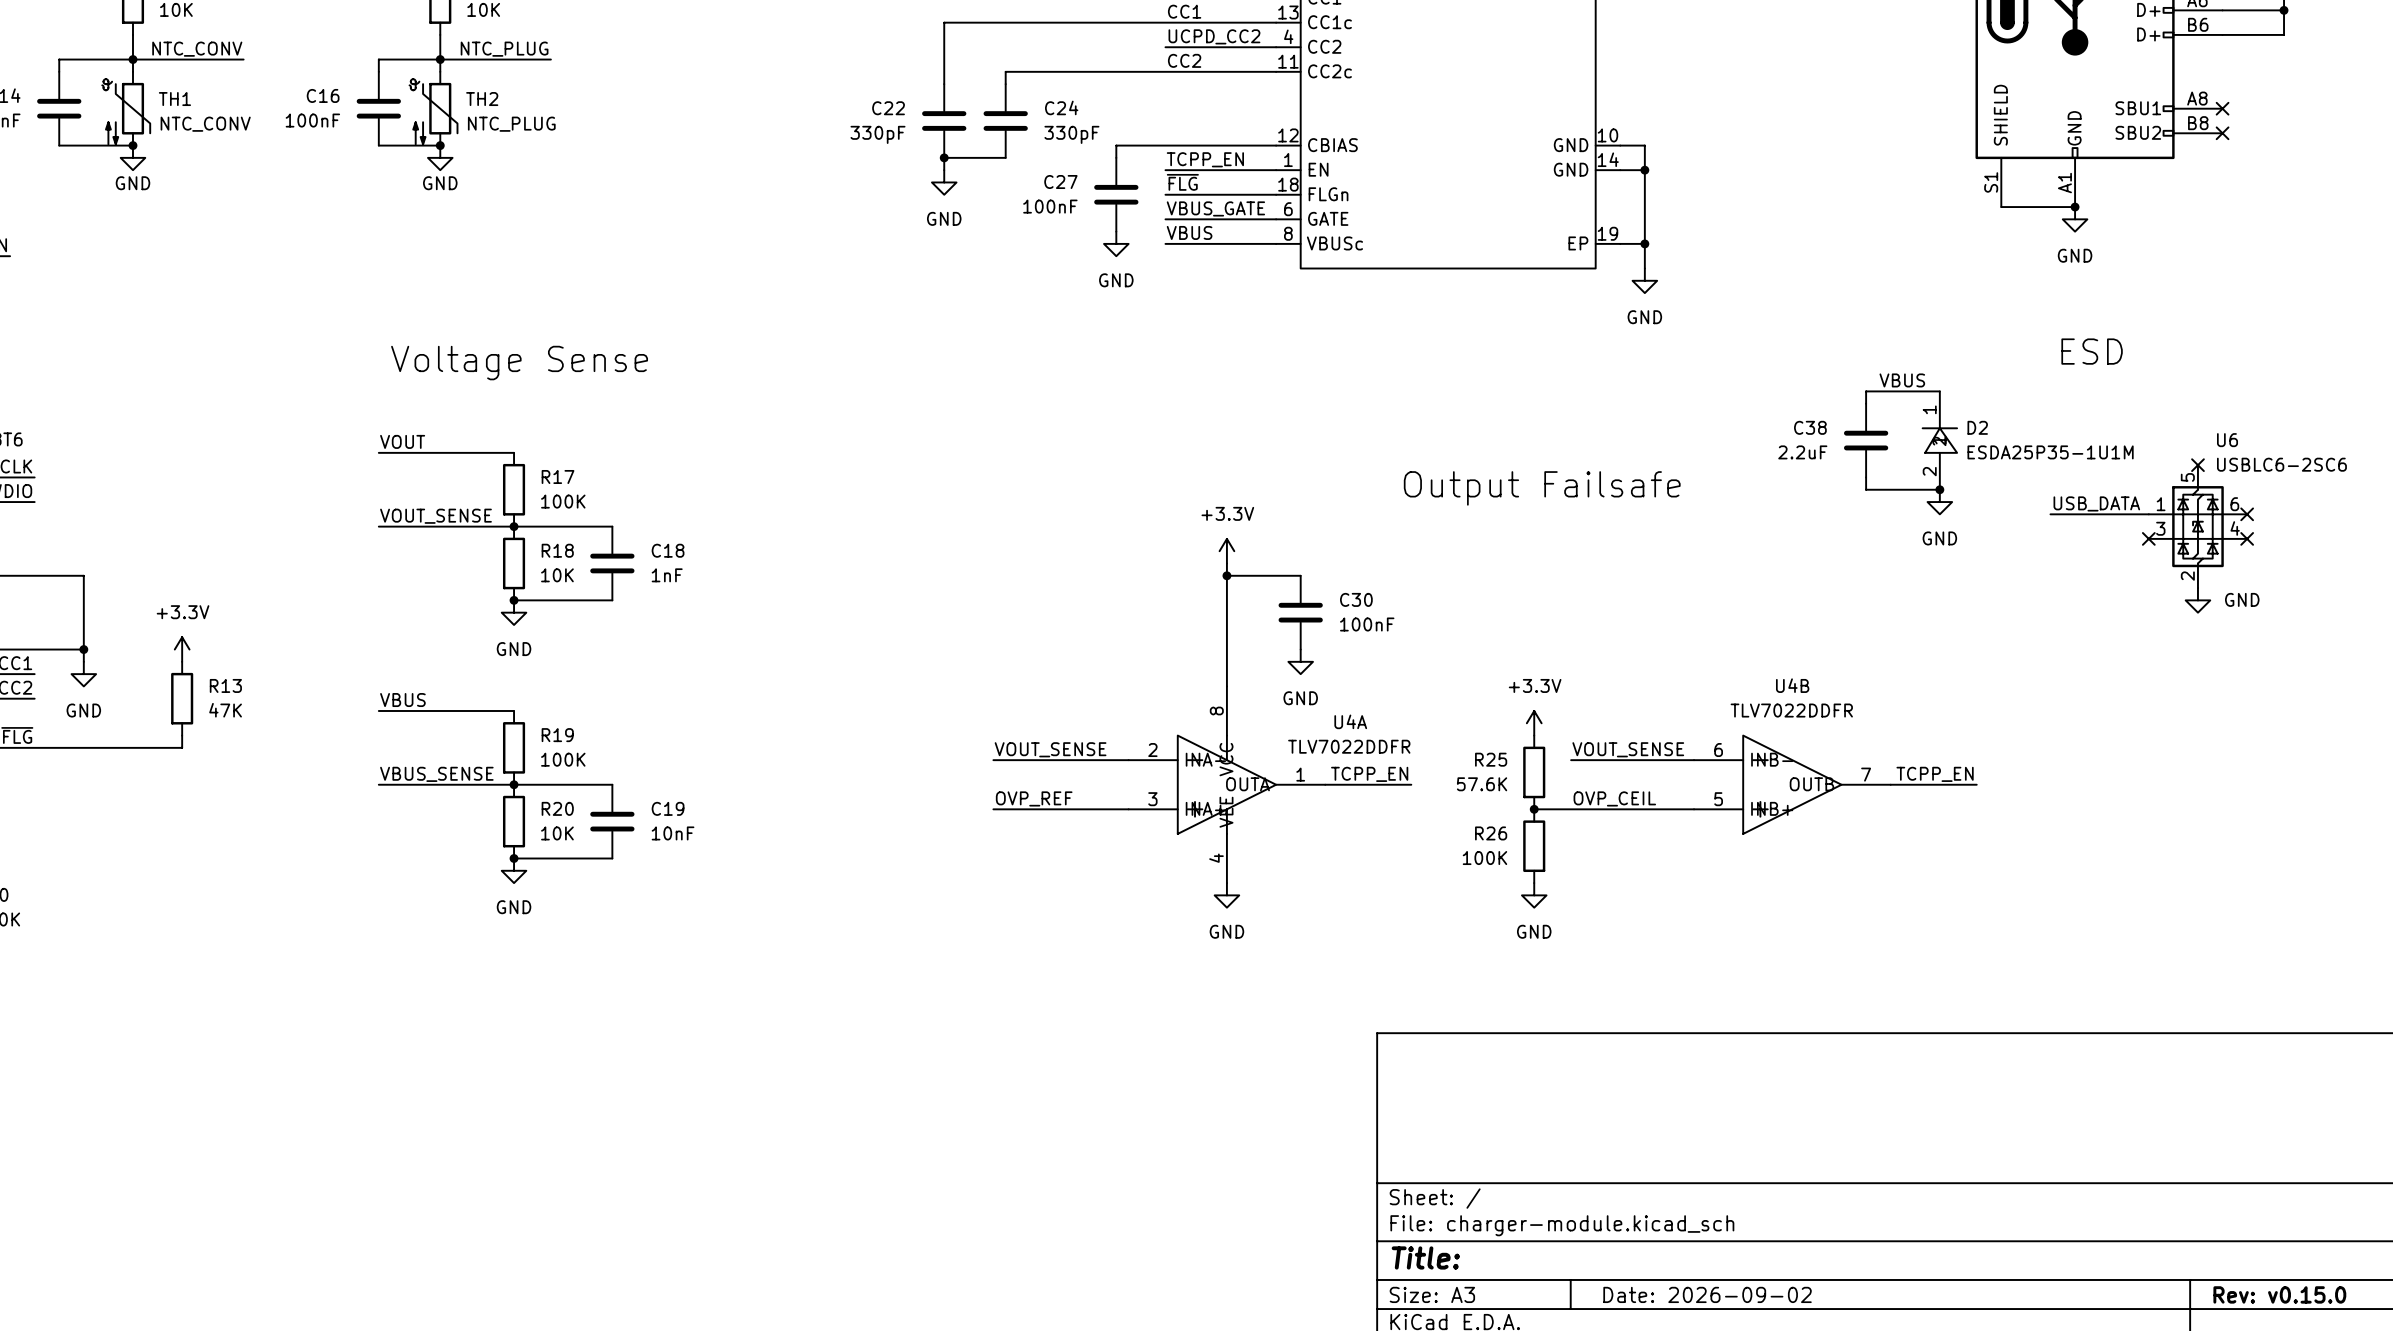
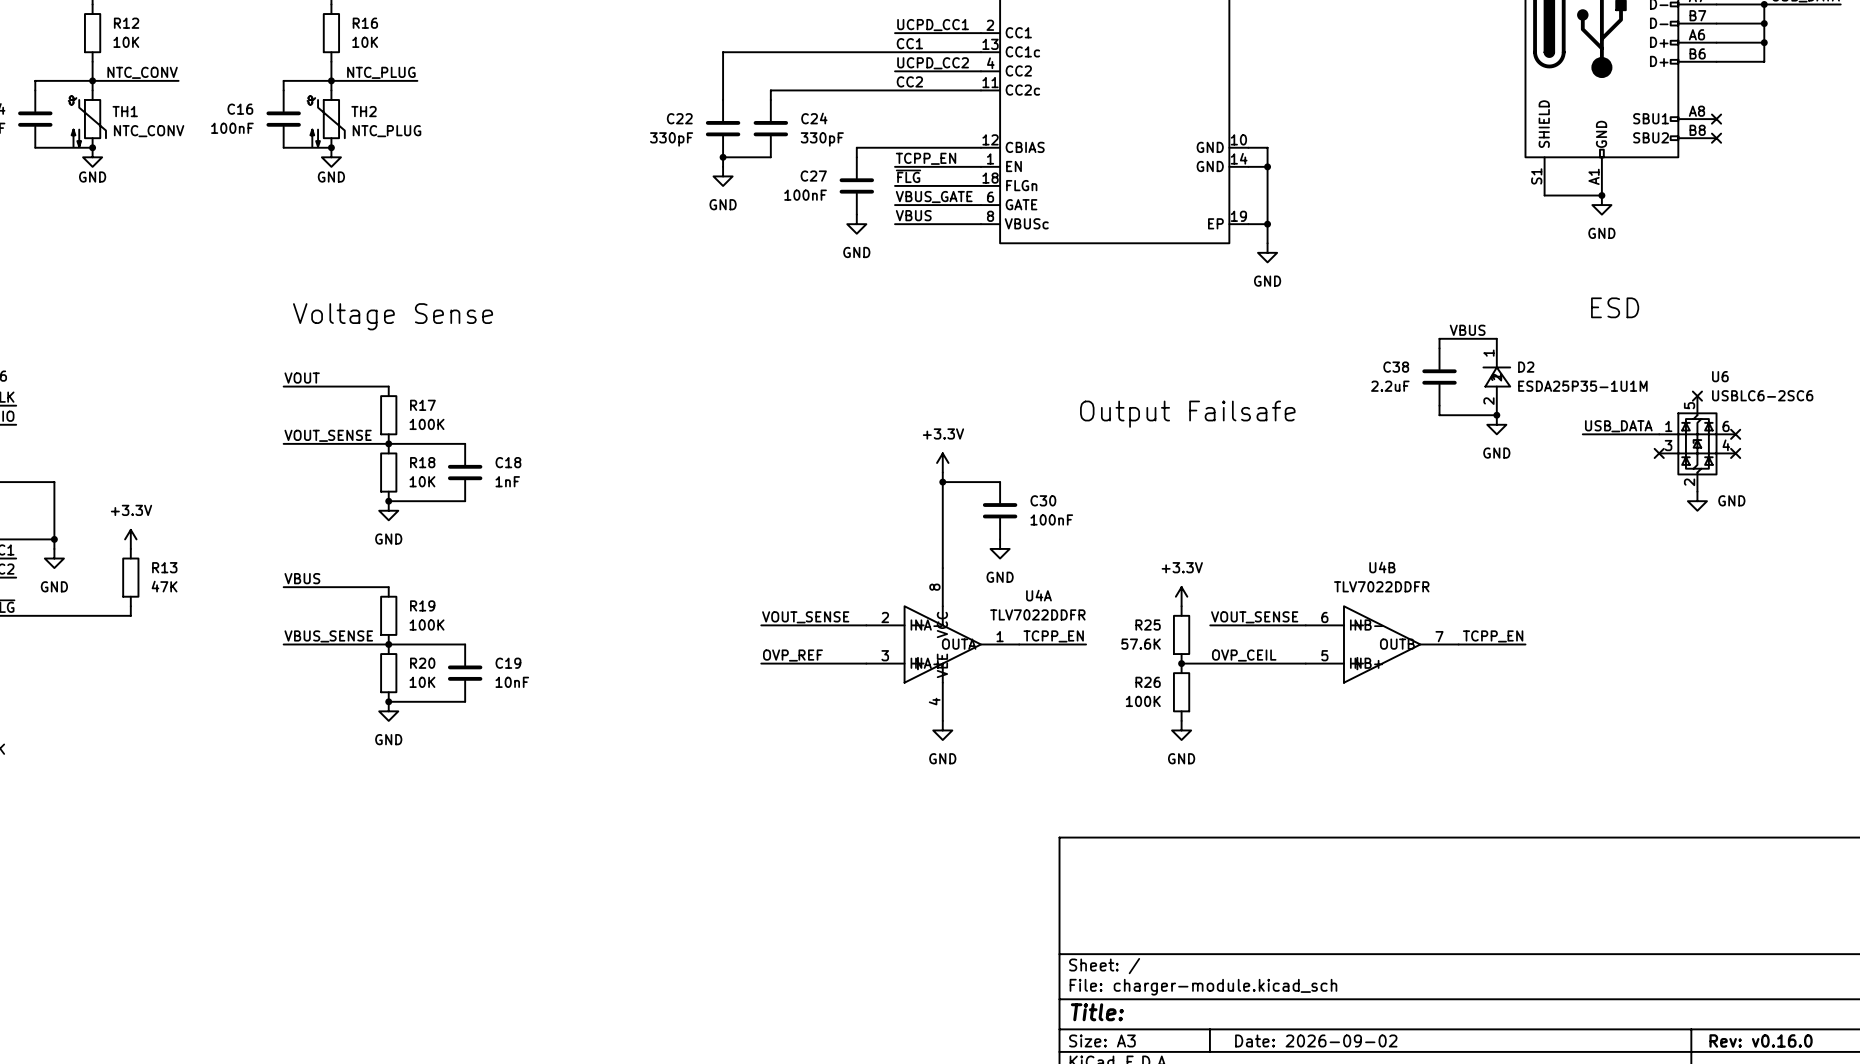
title block: Rev: v0.15.0 (2279, 1294) -> Rev: v0.16.0 (1761, 1040)

